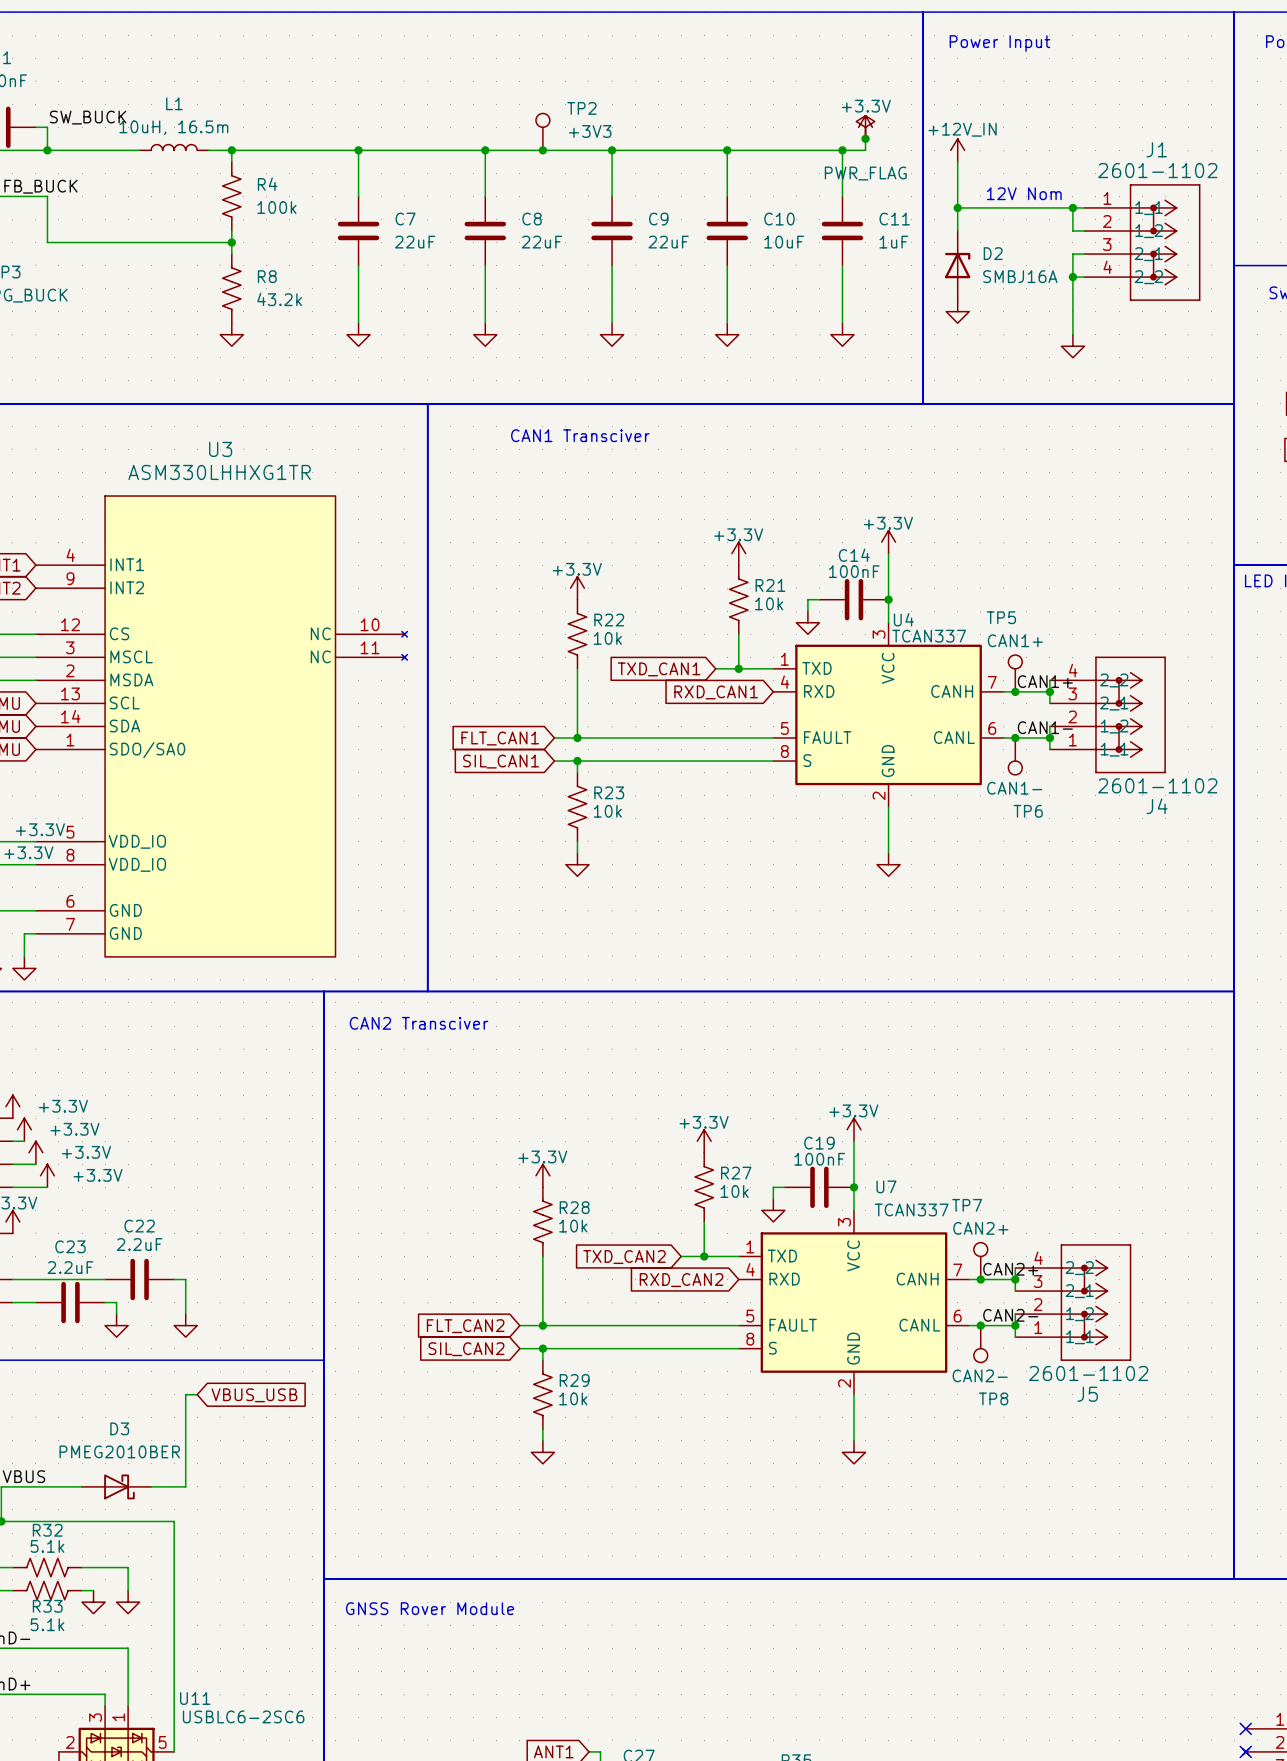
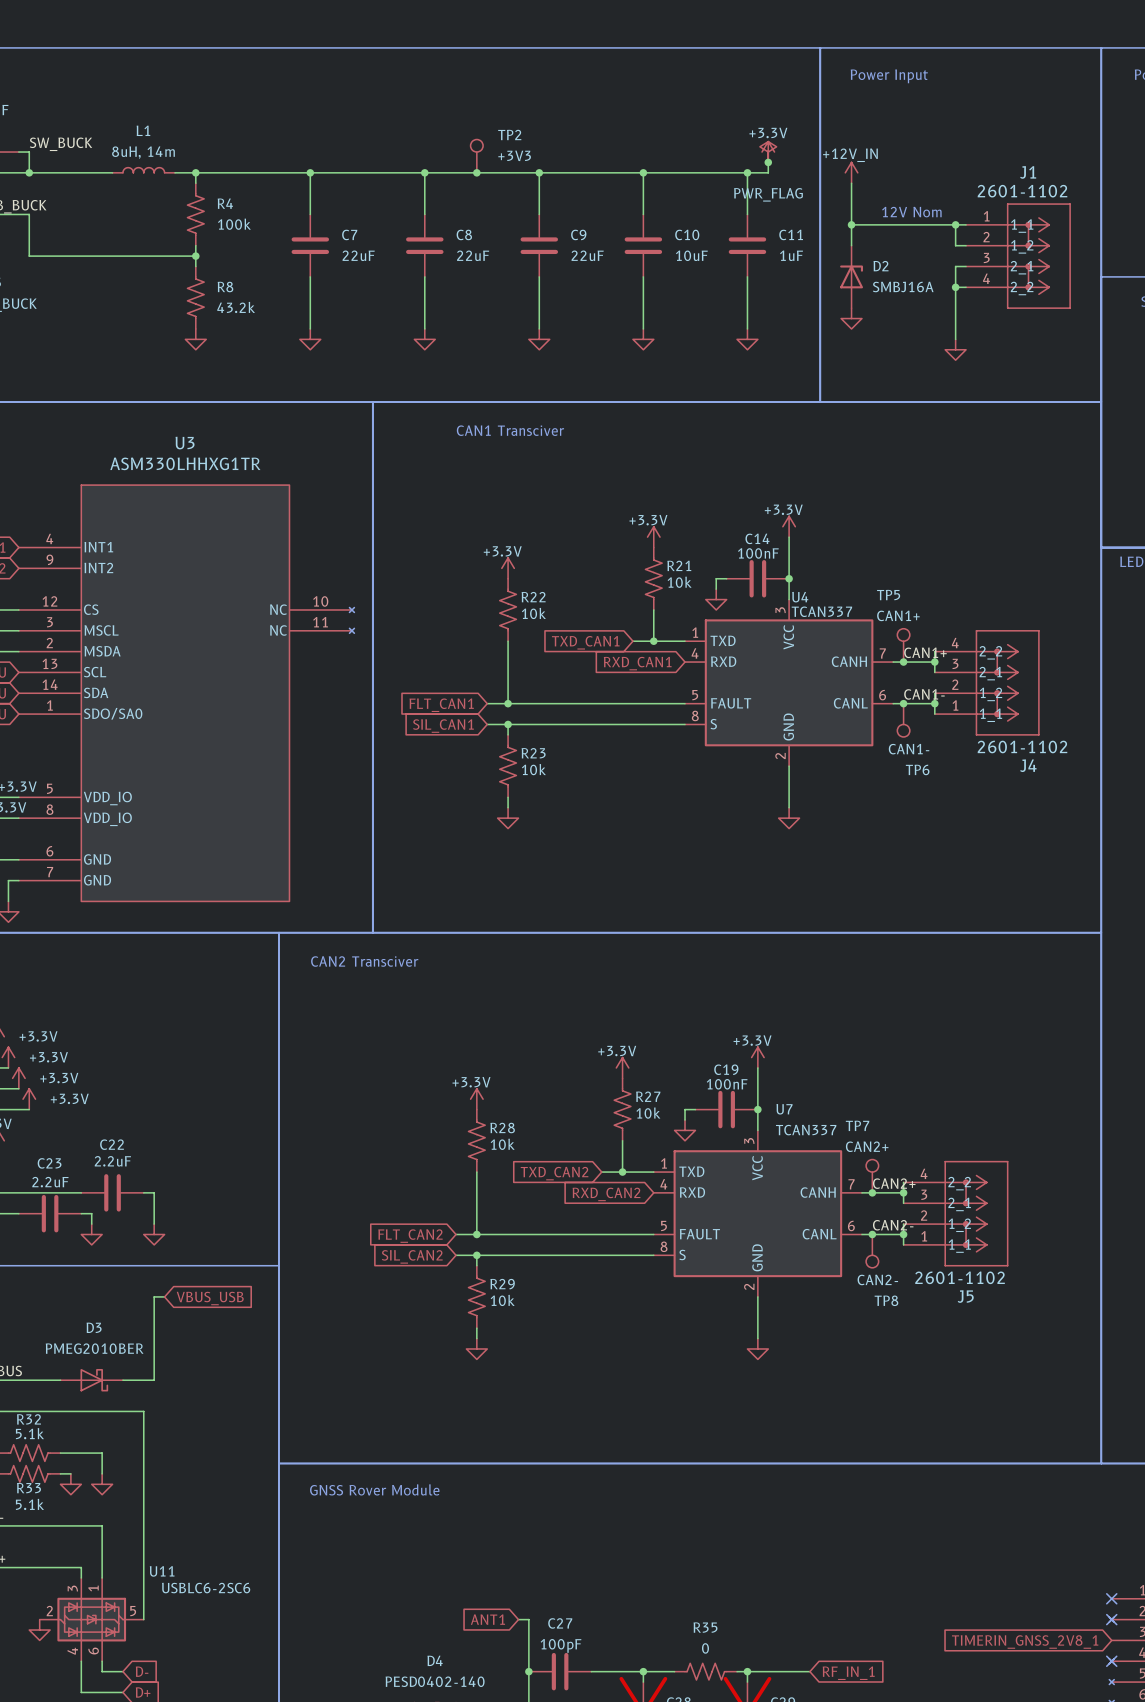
L1 value: 10uH, 16.5m (173, 127) -> 8uH, 14m (143, 152)

